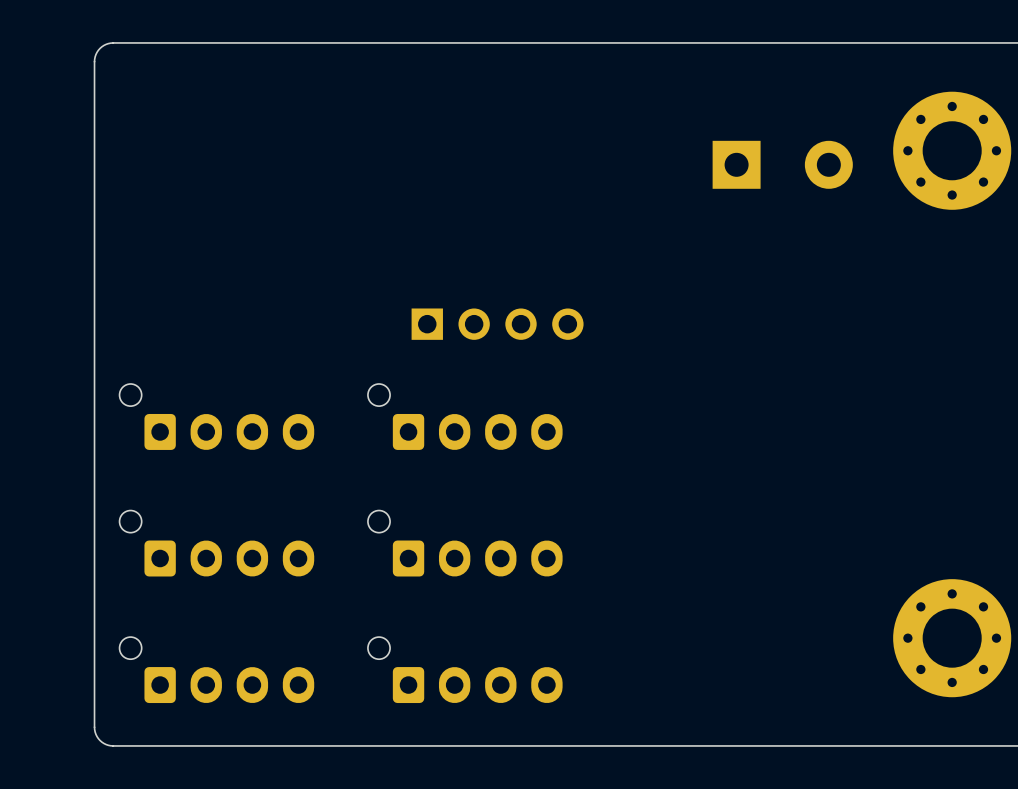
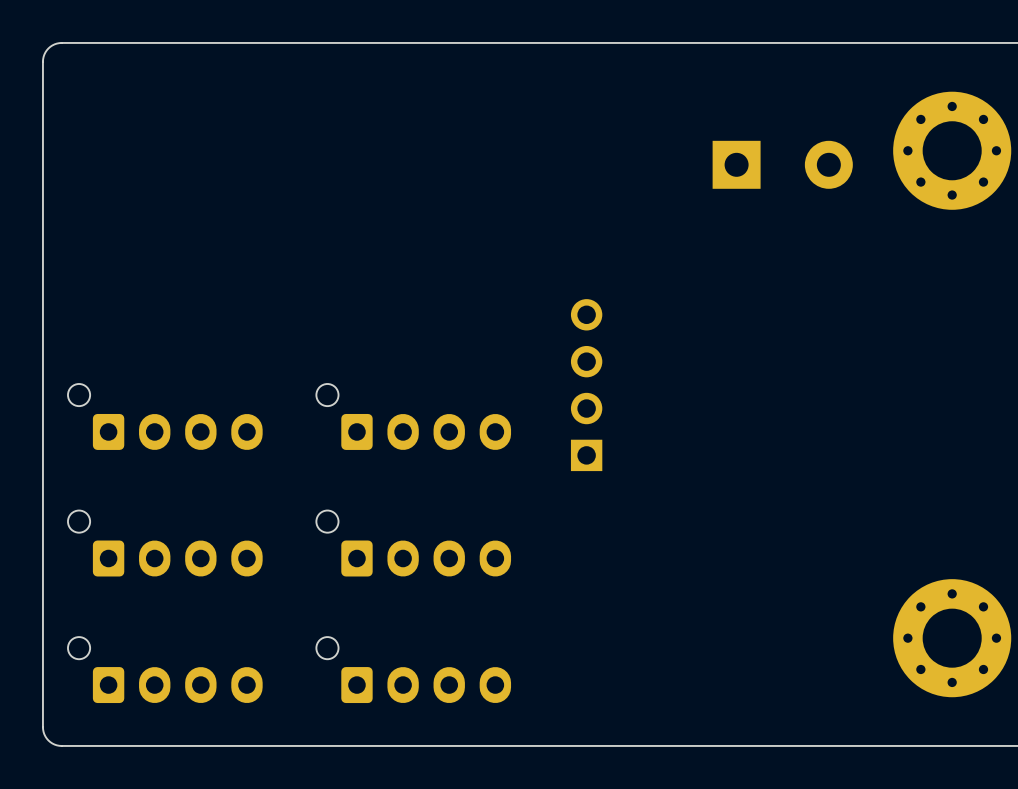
board edge: (113, 42) (100, 48) (94, 61) (94, 727) (100, 740) (113, 745) -> (113, 42) (56, 43) (46, 50) (42, 61) (43, 729) (46, 738) (56, 745) (113, 745)
part rotation: 0° (497, 324) -> 90° counterclockwise (586, 385)
part position: (497, 324) -> (586, 385)
part position: (216, 416) -> (165, 416)
part position: (465, 416) -> (413, 416)
part position: (216, 543) -> (165, 543)
part position: (465, 543) -> (413, 543)
part position: (216, 670) -> (165, 670)
part position: (465, 670) -> (413, 670)

